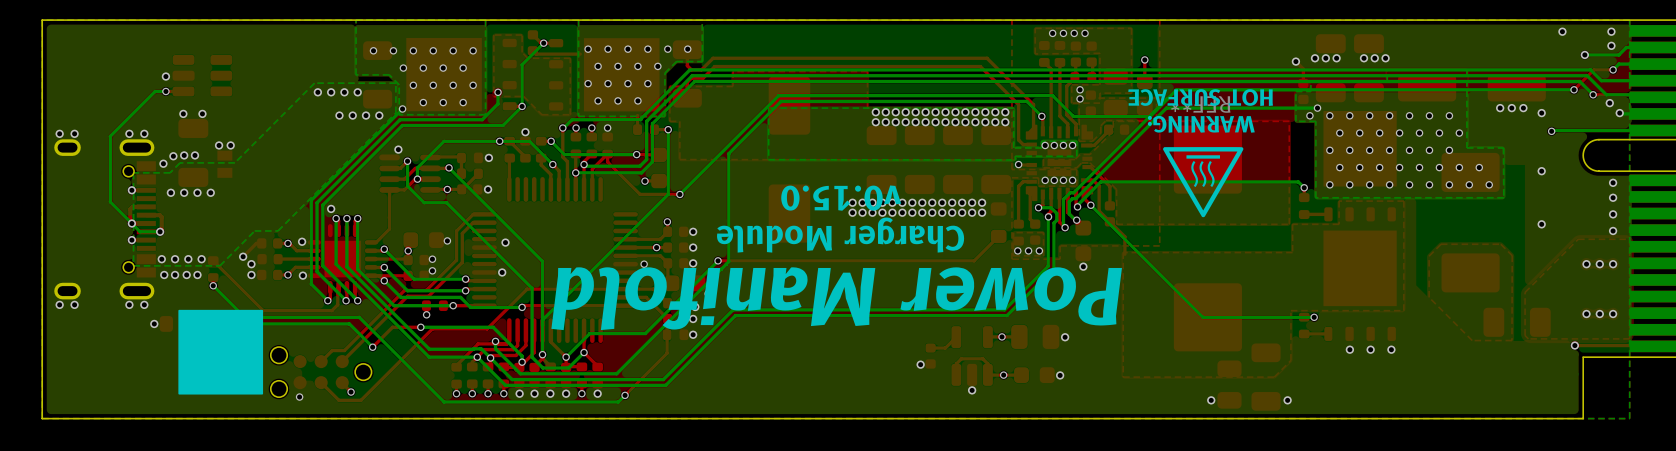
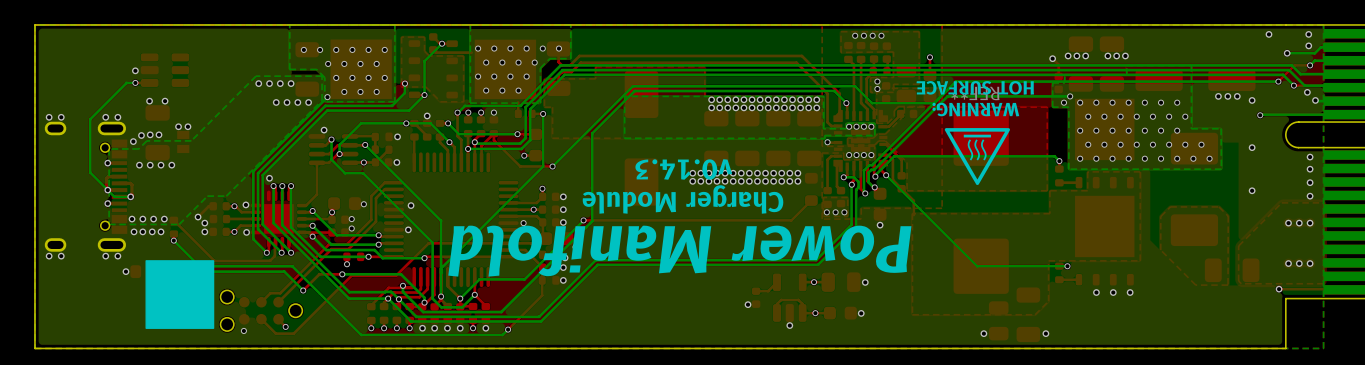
text: v0.15.0 (841, 198) -> v0.14.3 (683, 169)

